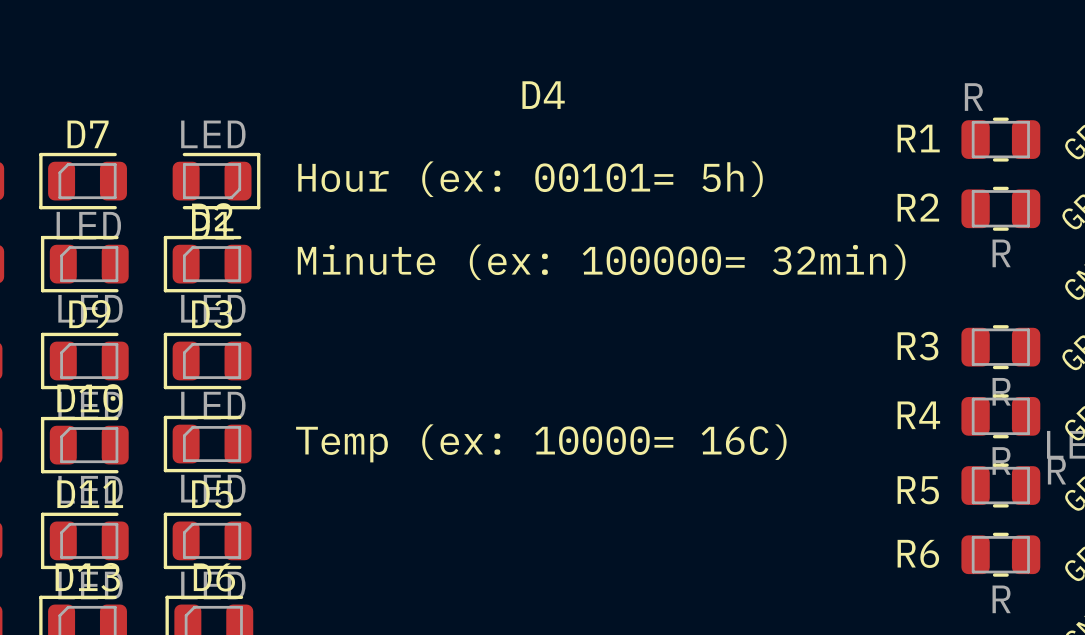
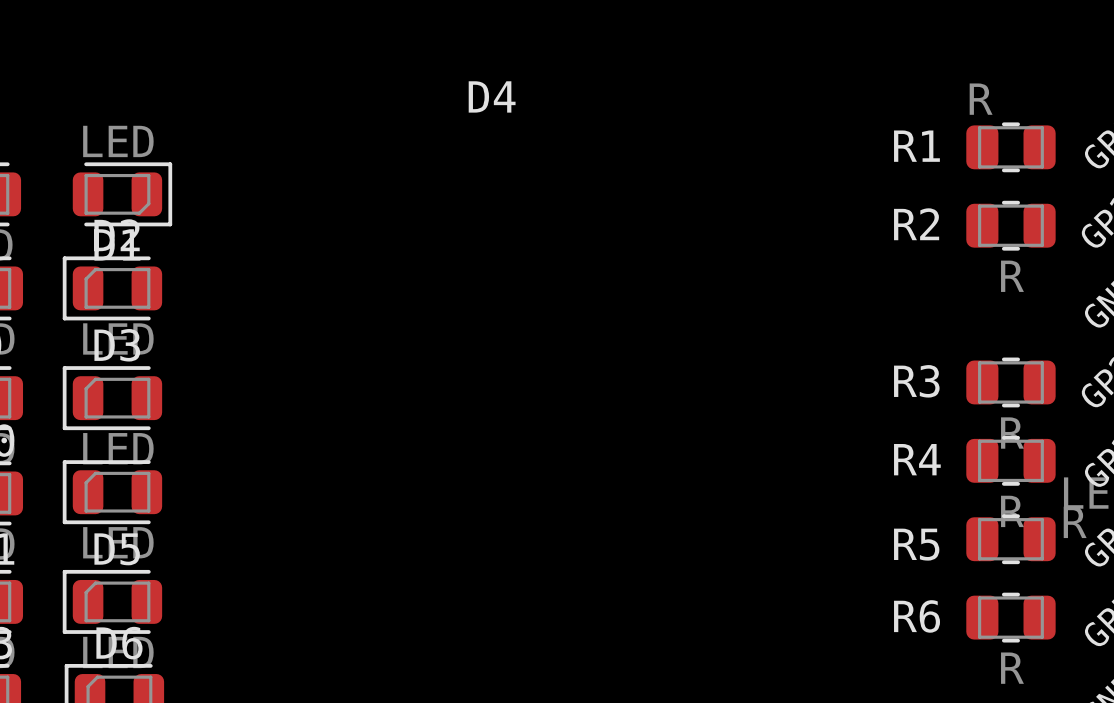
text: Hour (ex: 00101= 5h) (530, 179) -> none
text: Minute (ex: 100000= 32min) (601, 262) -> none
text: Temp (ex: 10000= 16C) (541, 443) -> none

